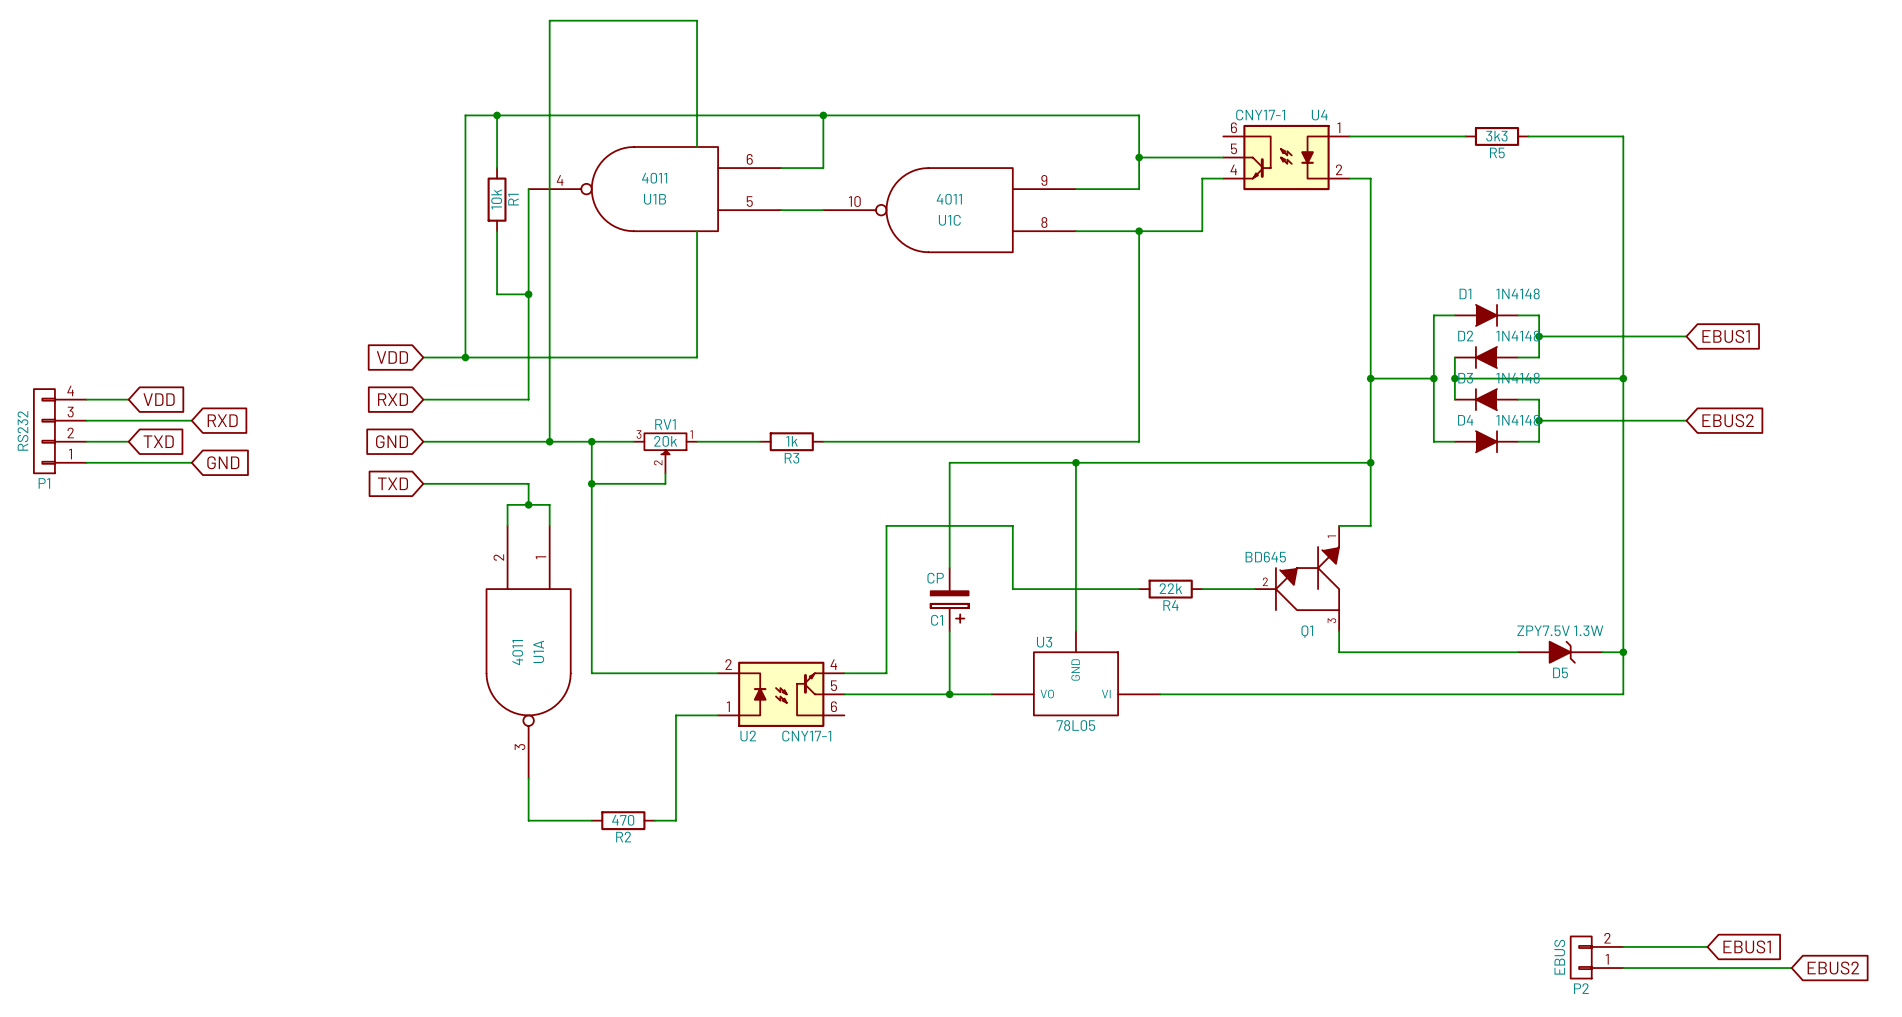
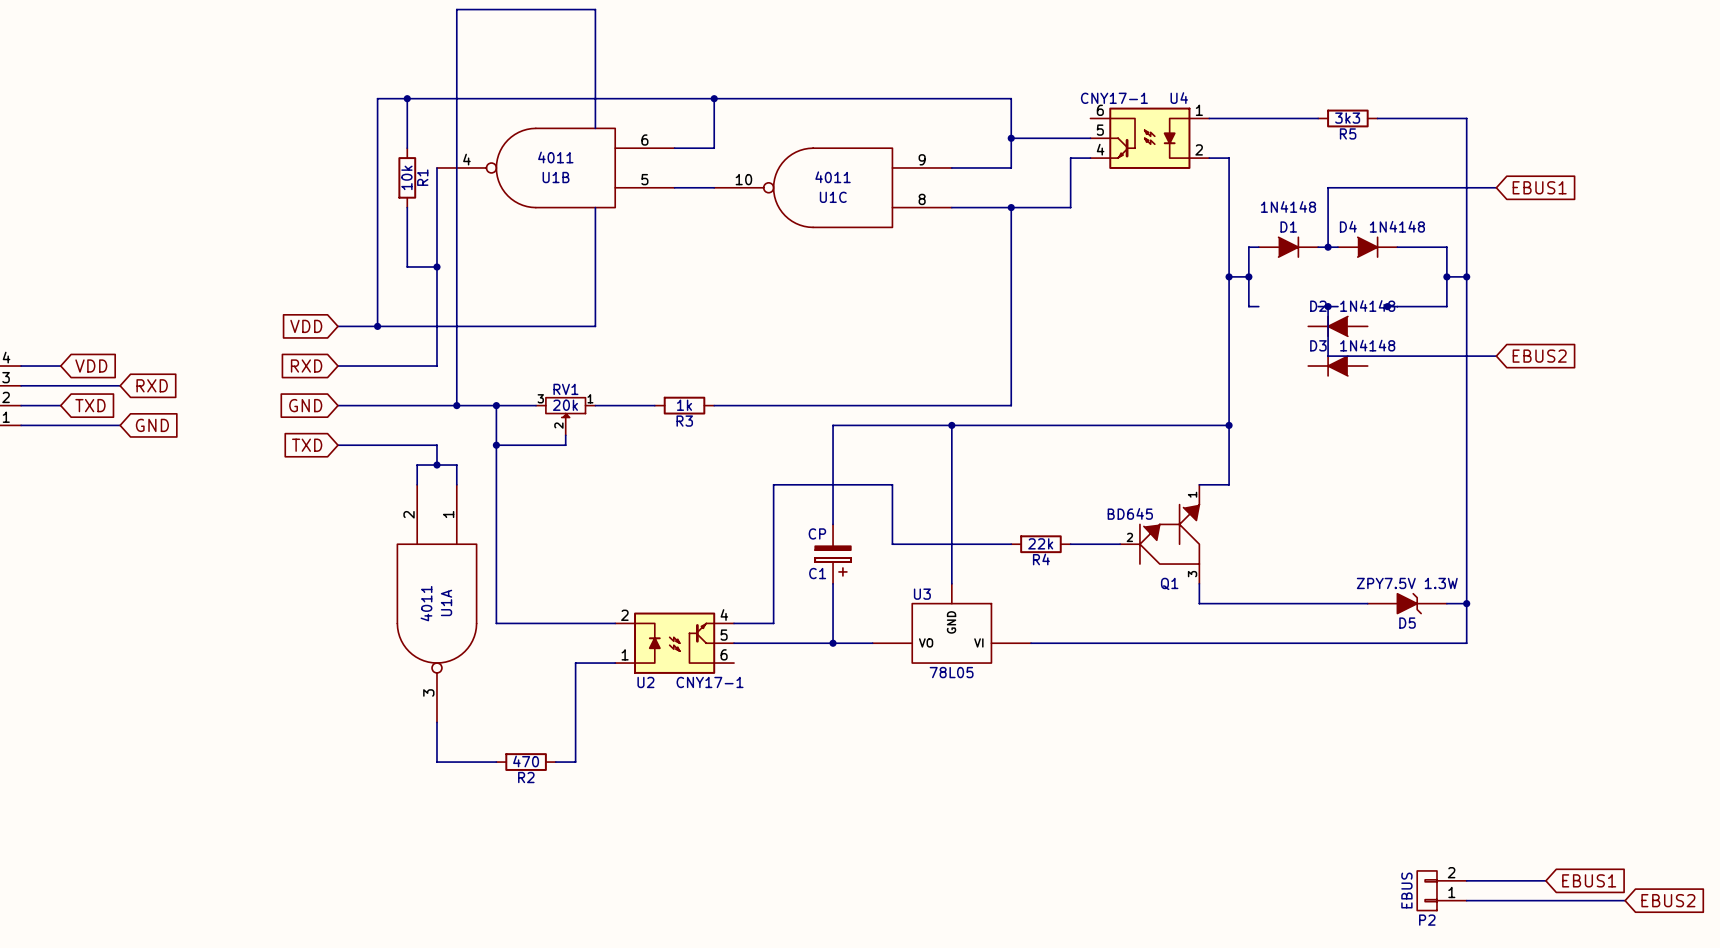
wire: none -> (1496, 187) (1328, 187) (1328, 247)
wire: none -> (1258, 247) (1248, 247) (1248, 306) (1258, 306)
wire: none -> (1318, 247) (1337, 247)
junction: none -> (1328, 247)
D1 name position: D1 (1465, 293) -> D1 (1288, 227)
D1 value position: 1N4148 (1518, 293) -> 1N4148 (1288, 206)
wire: none -> (1229, 276) (1248, 276)
junction: none -> (1229, 276)
junction: none -> (1248, 276)
wire: none -> (1446, 276) (1466, 276)
junction: none -> (1446, 276)
junction: none -> (1466, 276)
wire: (1454, 315) (1433, 315) (1433, 441) (1454, 441) -> none
D1 position: (1486, 315) -> (1288, 247)
wire: (1518, 315) (1539, 315) (1539, 357) (1518, 357) -> none
wire: none -> (1318, 306) (1337, 306)
wire: none -> (1328, 306) (1328, 356) (1496, 356)
junction: none -> (1328, 306)
wire: (1602, 336) (1686, 336) -> (1446, 306) (1446, 247) (1397, 247)
global label position: EBUS1 (1726, 336) -> EBUS1 (1539, 187)
wire: (1454, 357) (1454, 399) -> none
wire: (1370, 378) (1433, 378) -> none
junction: (1370, 378) -> none
junction: (1433, 378) -> none
wire: (1454, 378) (1623, 378) -> none
junction: (1454, 378) -> none
junction: (1623, 378) -> none
wire: (1518, 399) (1539, 399) (1539, 441) (1518, 441) -> none
wire: (1539, 420) (1686, 420) -> none
junction: (1539, 420) -> none
global label position: EBUS2 (1728, 420) -> EBUS2 (1539, 356)
D4 position: (1486, 441) -> (1367, 247)

